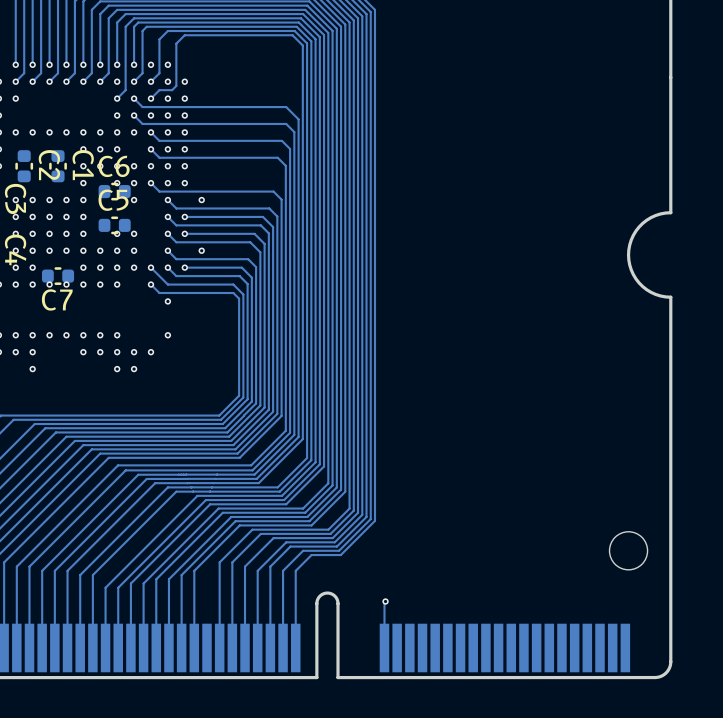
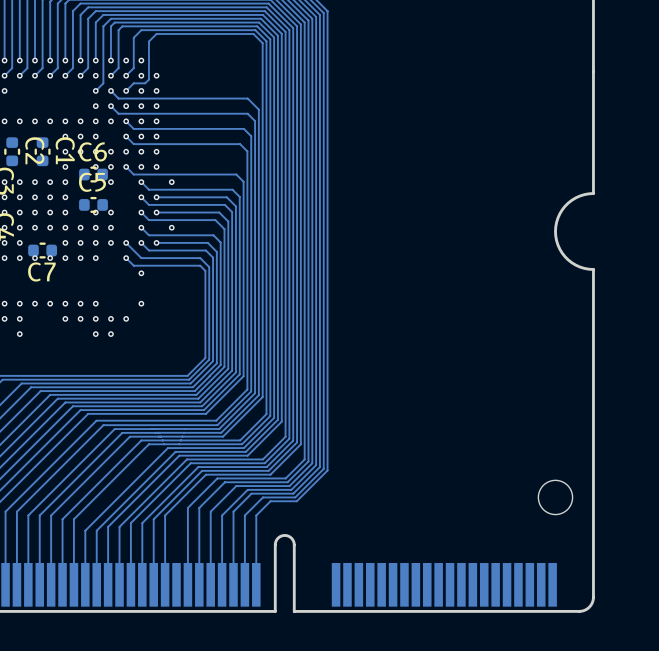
track: (385, 601) (384, 647) -> none
via: (385, 601) -> none

